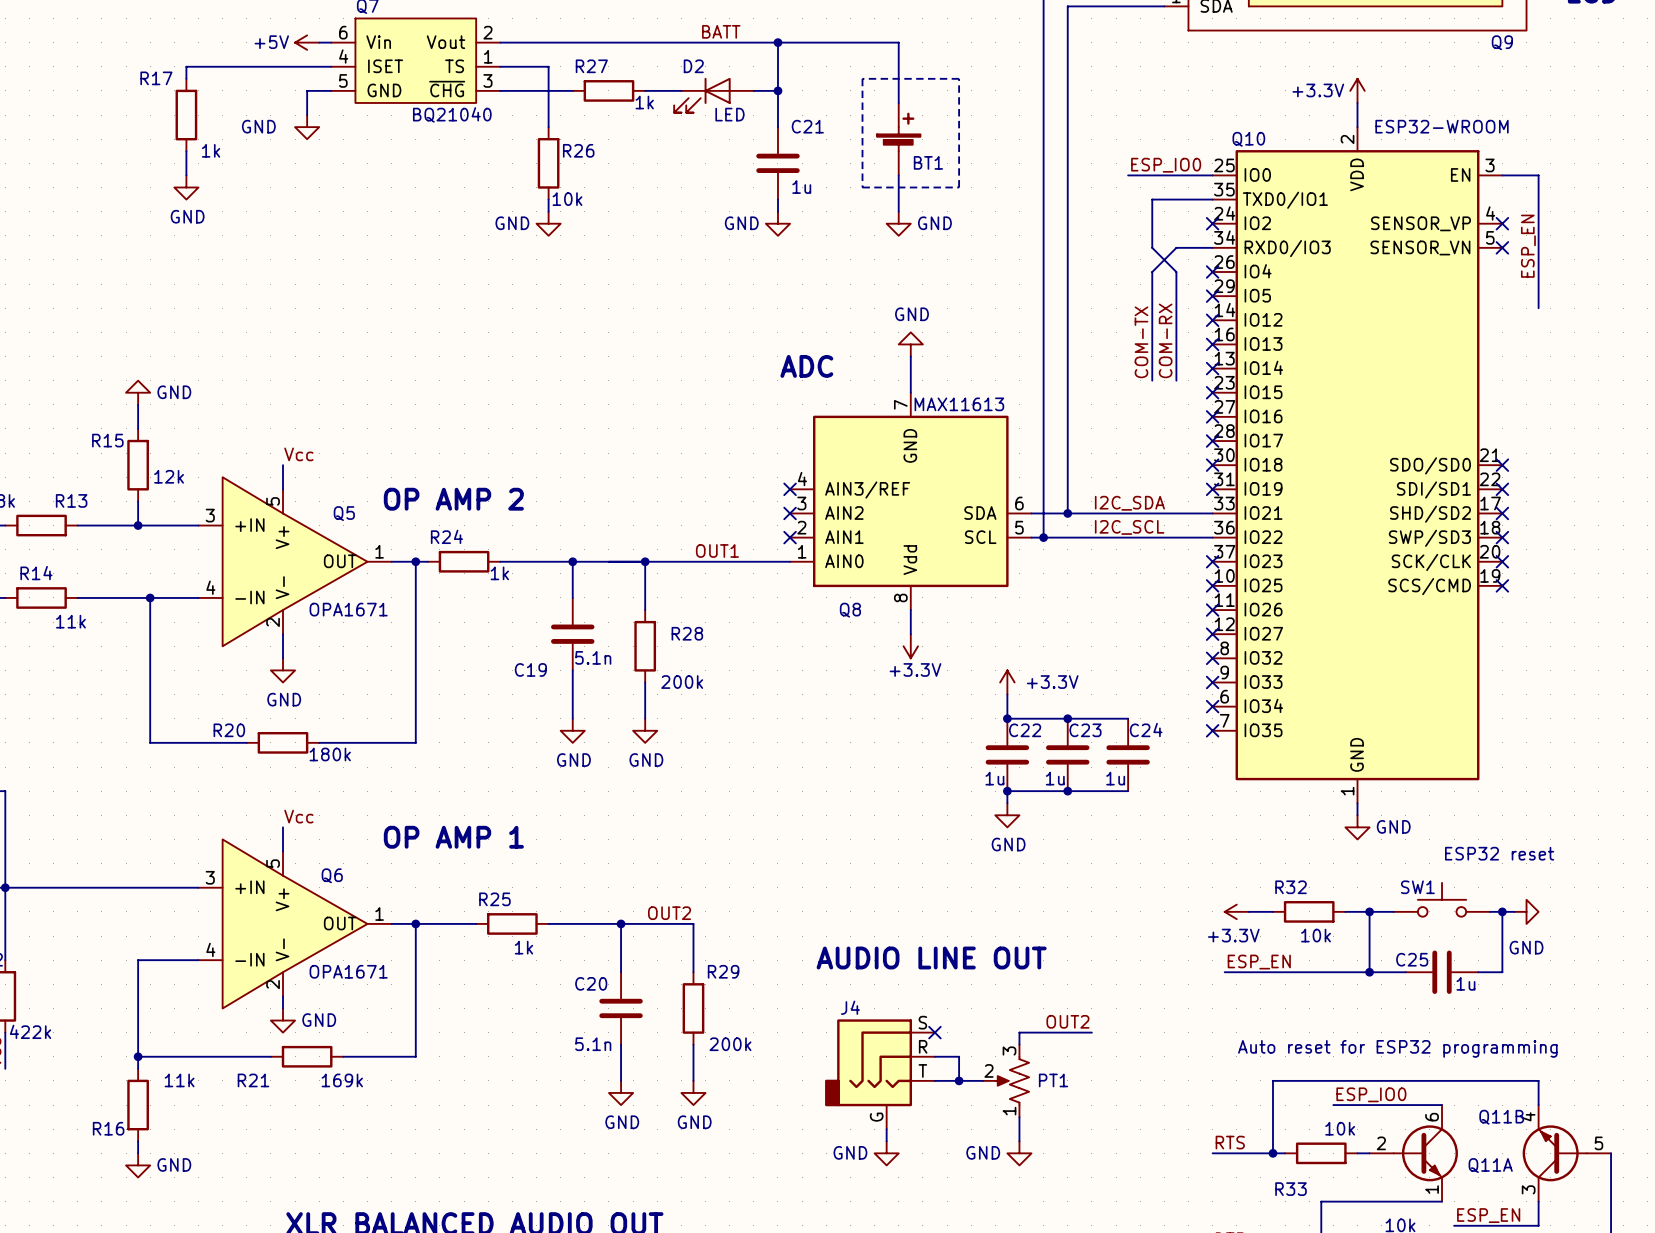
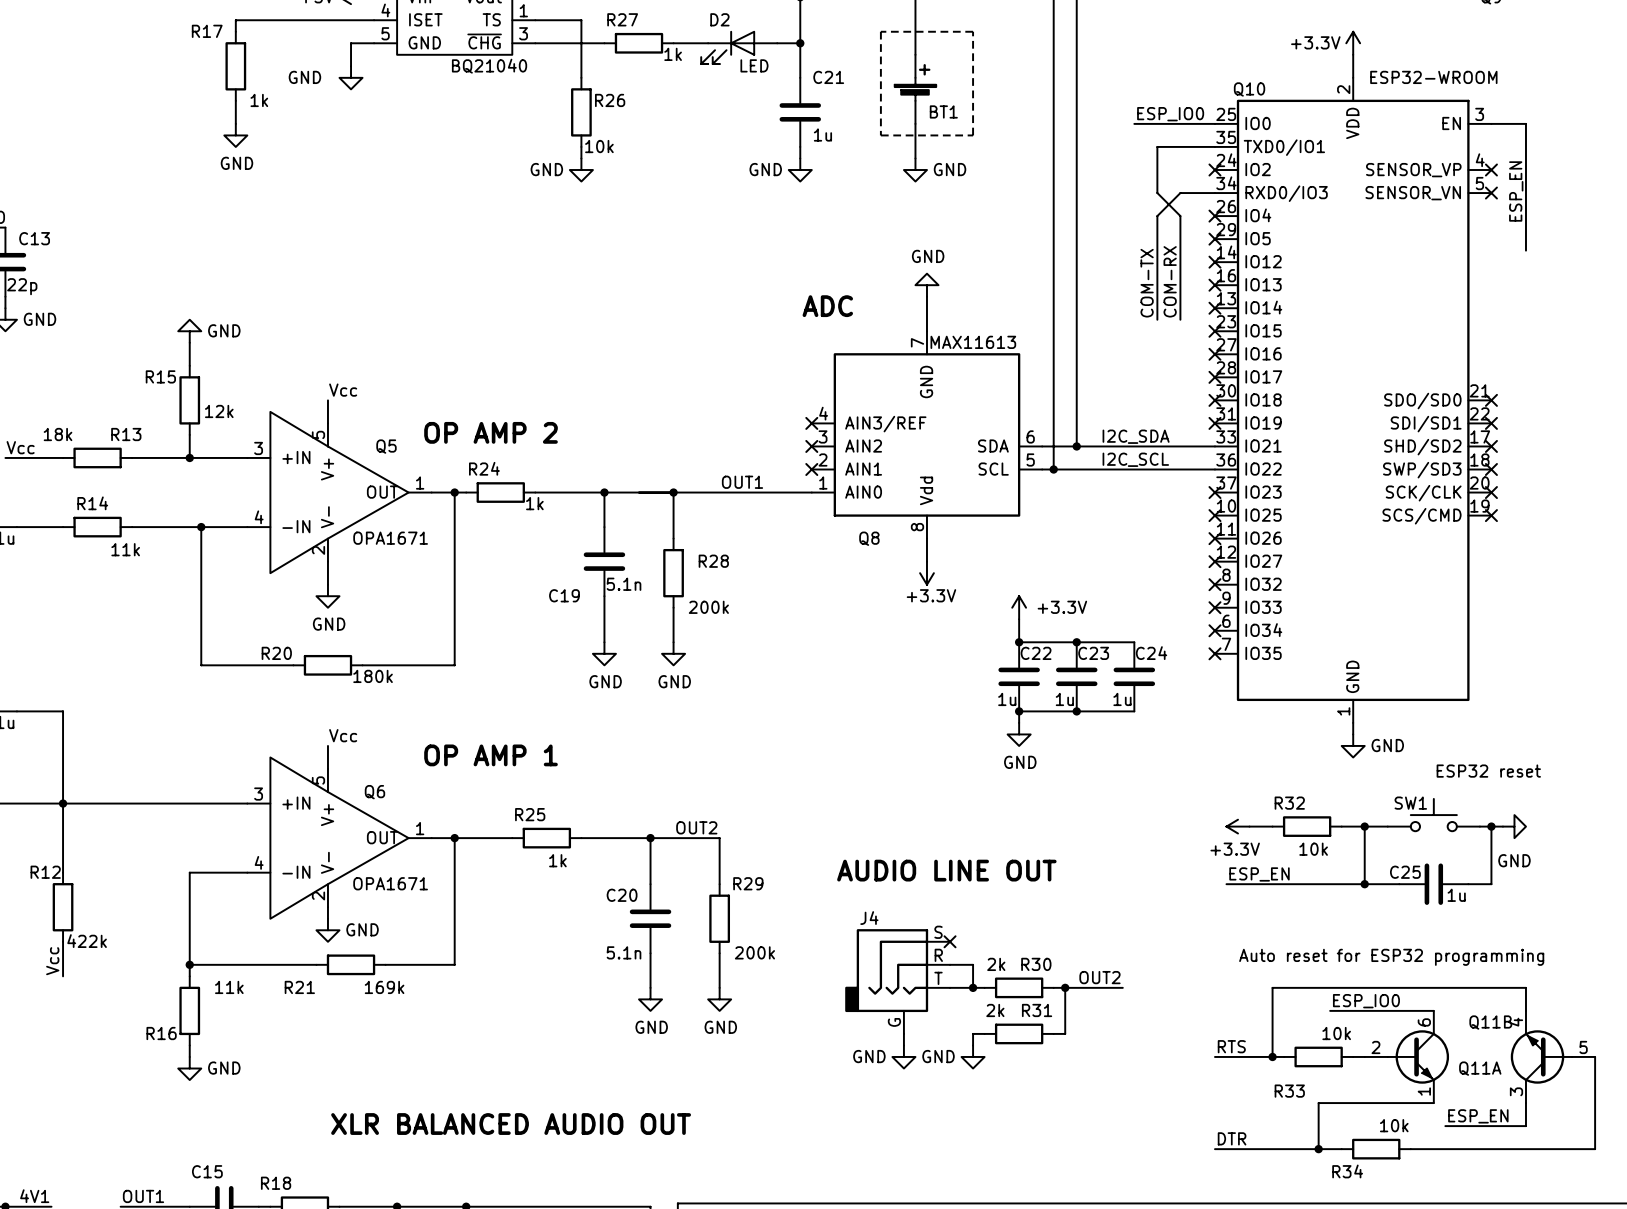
label position: OUT2 (1067, 1021) -> OUT2 (1099, 977)
wire: (1091, 1032) (1019, 1032) (1019, 1044) -> none
PT1: (1006, 1080) -> none
R30: none -> 2k (1019, 987)
wire: none -> (1053, 987) (1122, 987)
wire: none -> (1065, 987) (1065, 1033) (1053, 1033)
junction: none -> (1065, 987)
wire: (1019, 1117) (1019, 1141) -> none
wire: none -> (984, 1033) (973, 1033) (973, 1045)
R31: none -> 2k (1019, 1033)
power symbol position: GND (1019, 1153) -> GND (973, 1056)

